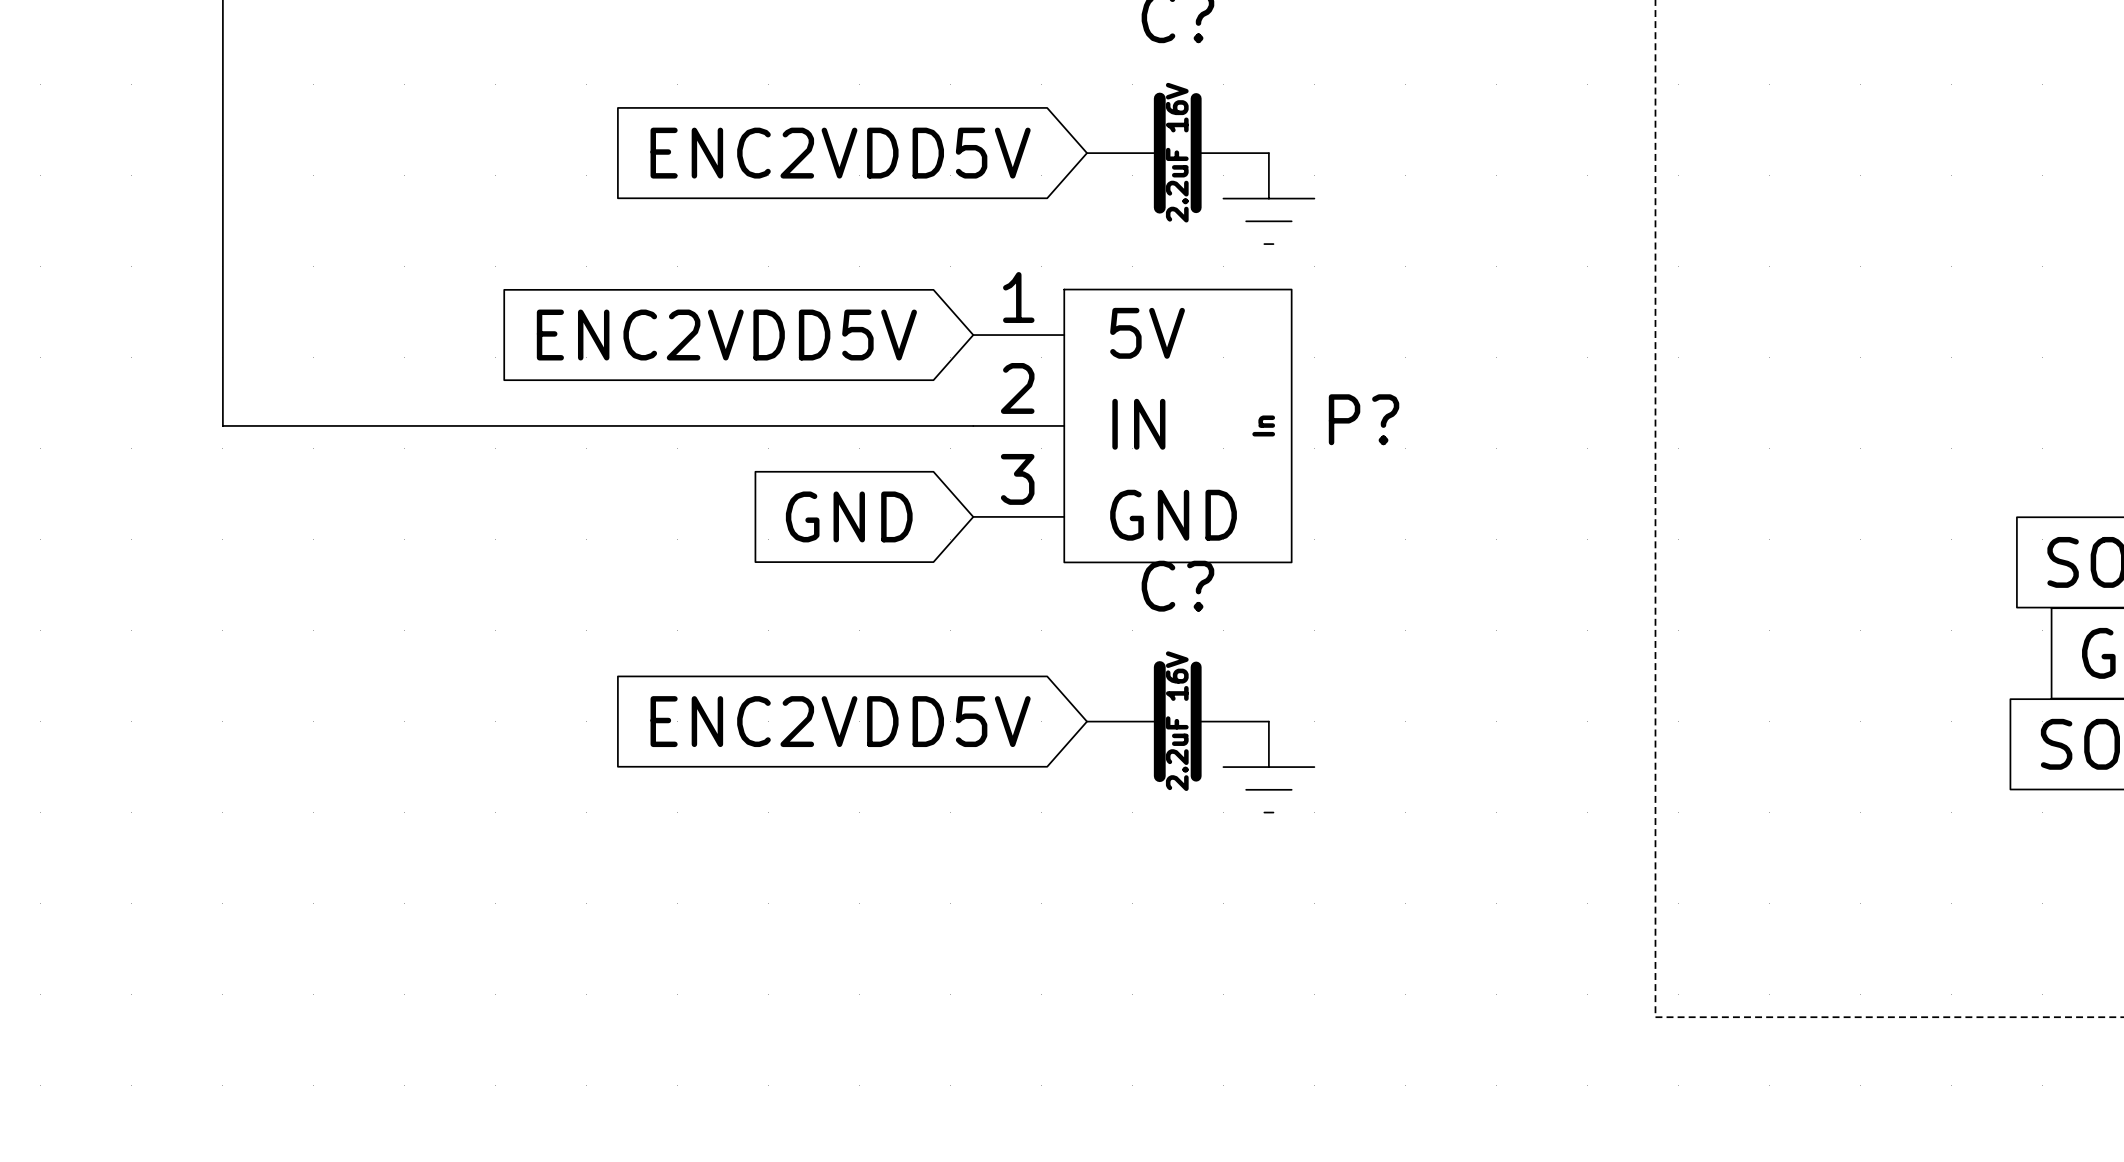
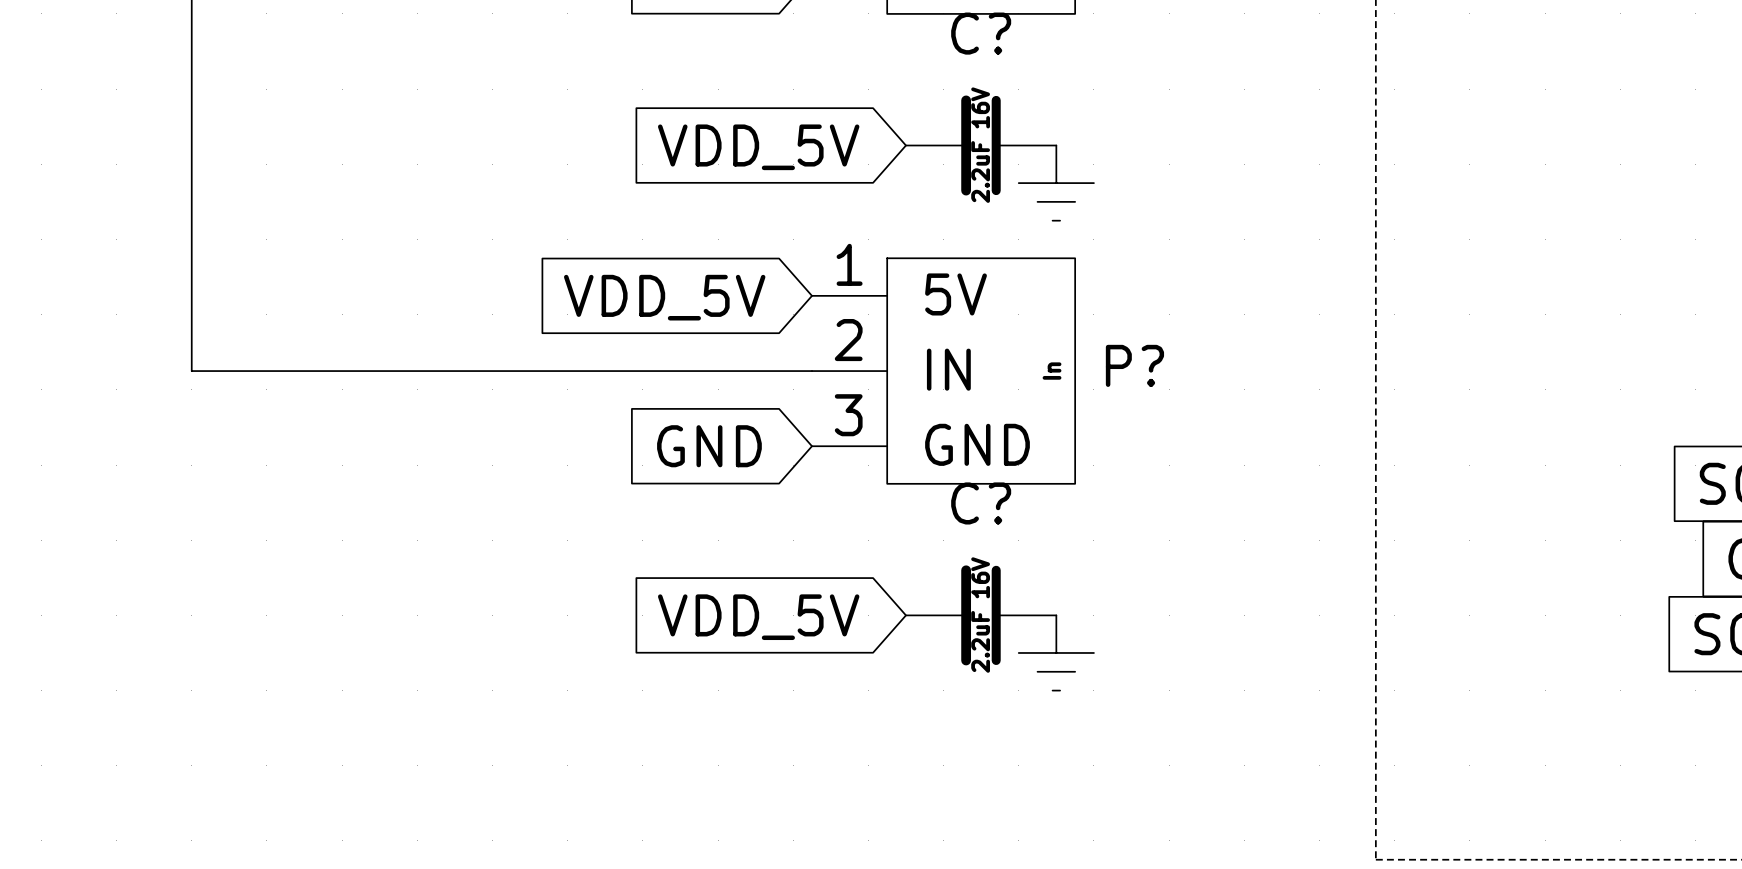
global label: ENC2VDD5V (840, 153) -> VDD_5V (758, 147)
global label: ENC2VDD5V (726, 335) -> VDD_5V (664, 297)
global label: ENC2VDD5V (840, 721) -> VDD_5V (758, 617)

